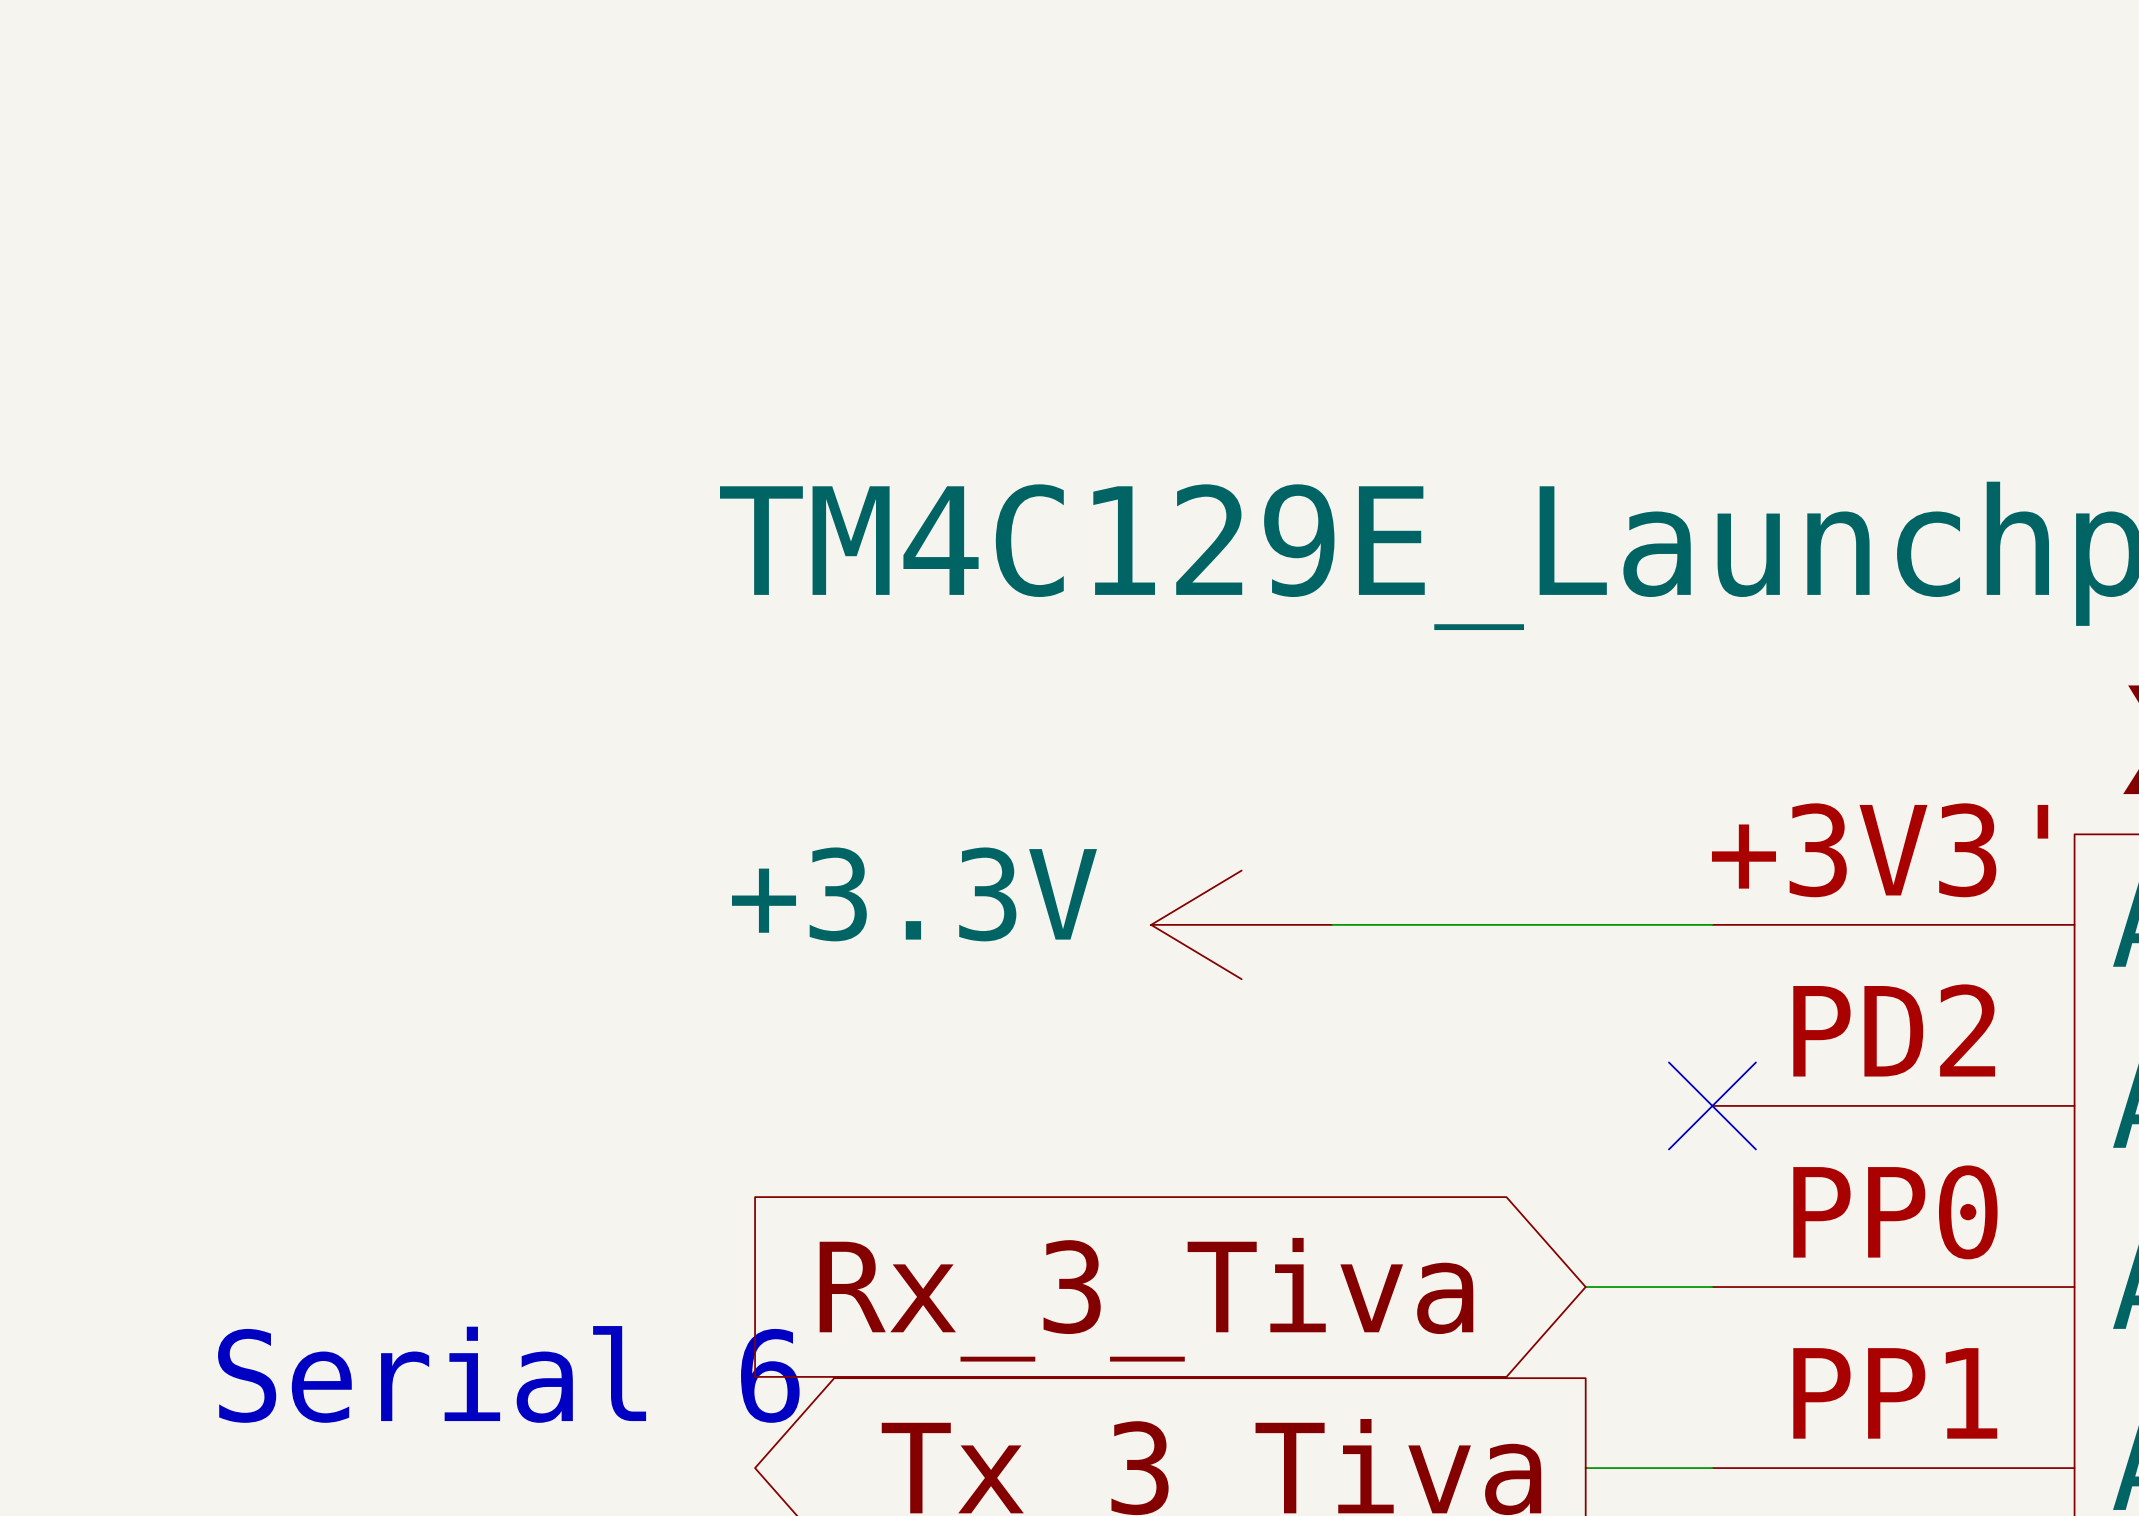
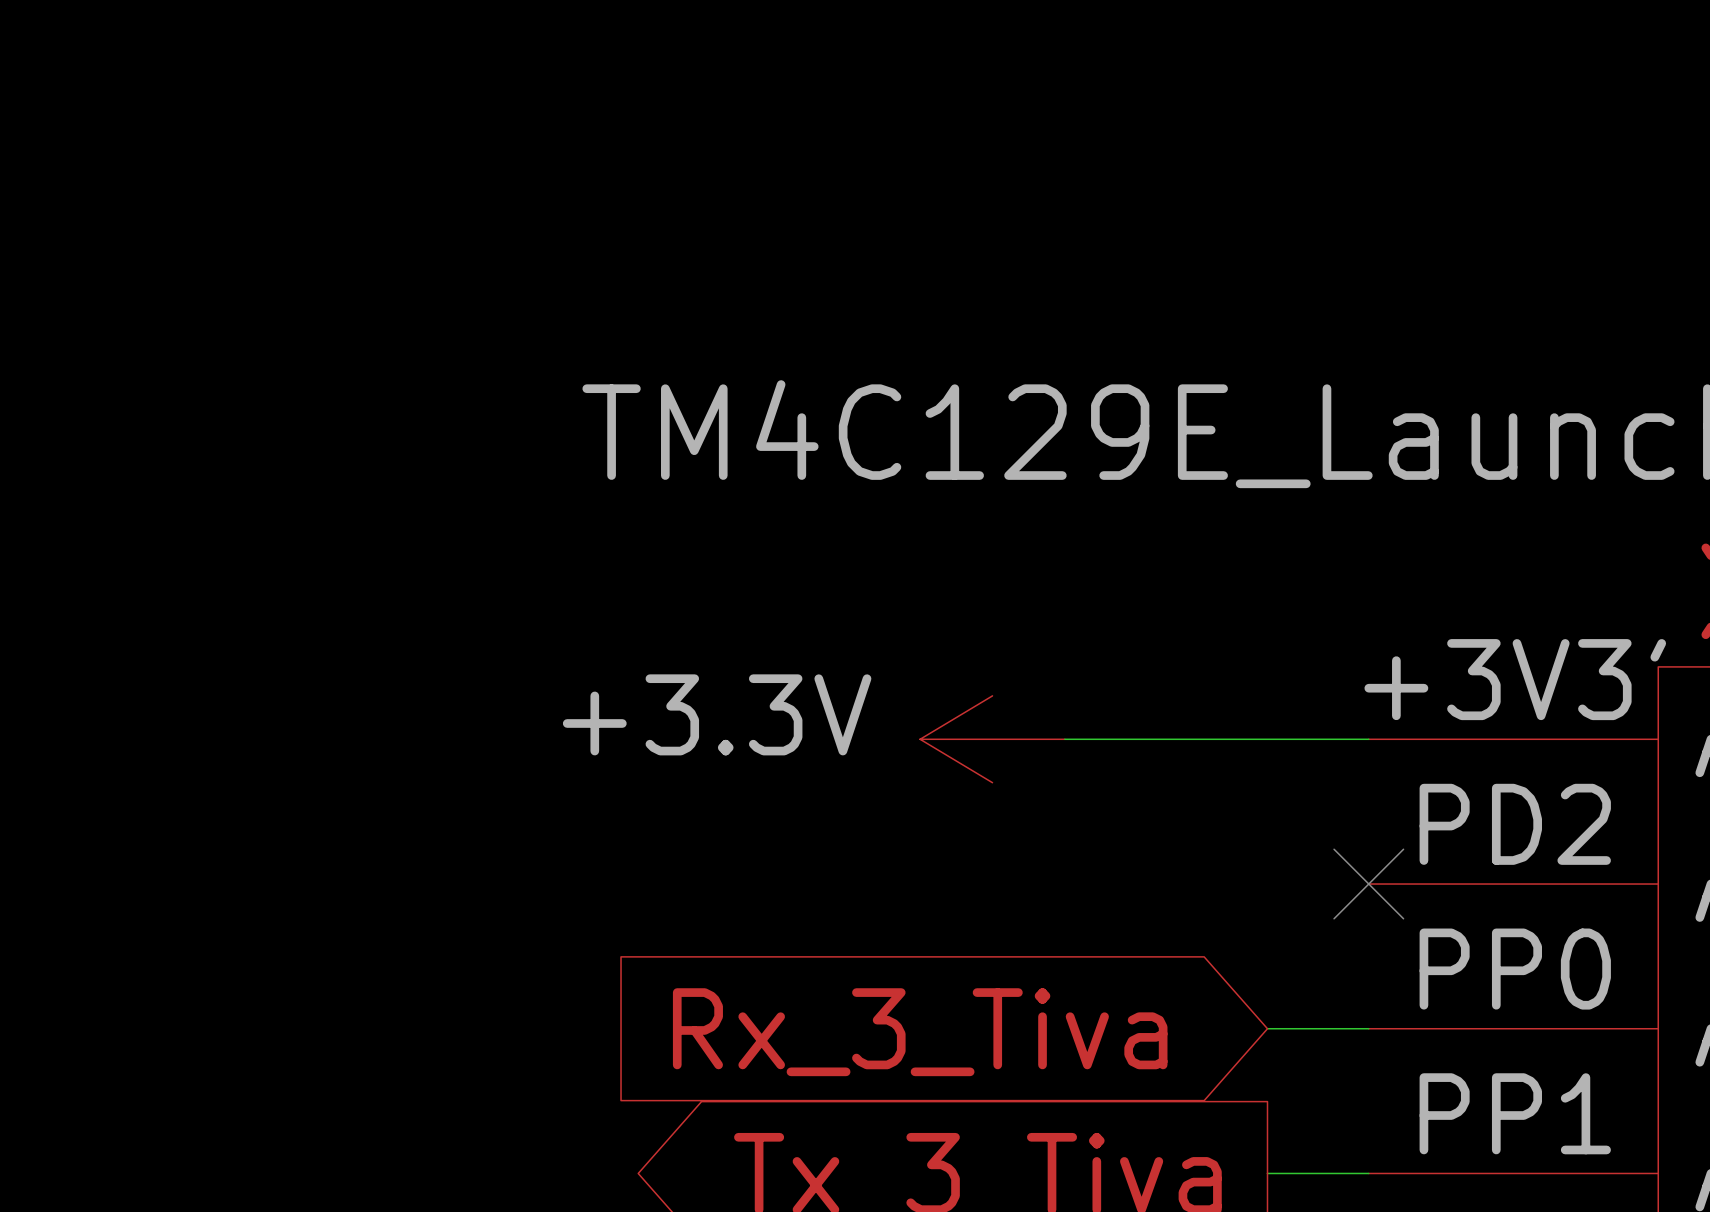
text: Serial 6 (508, 1374) -> none

